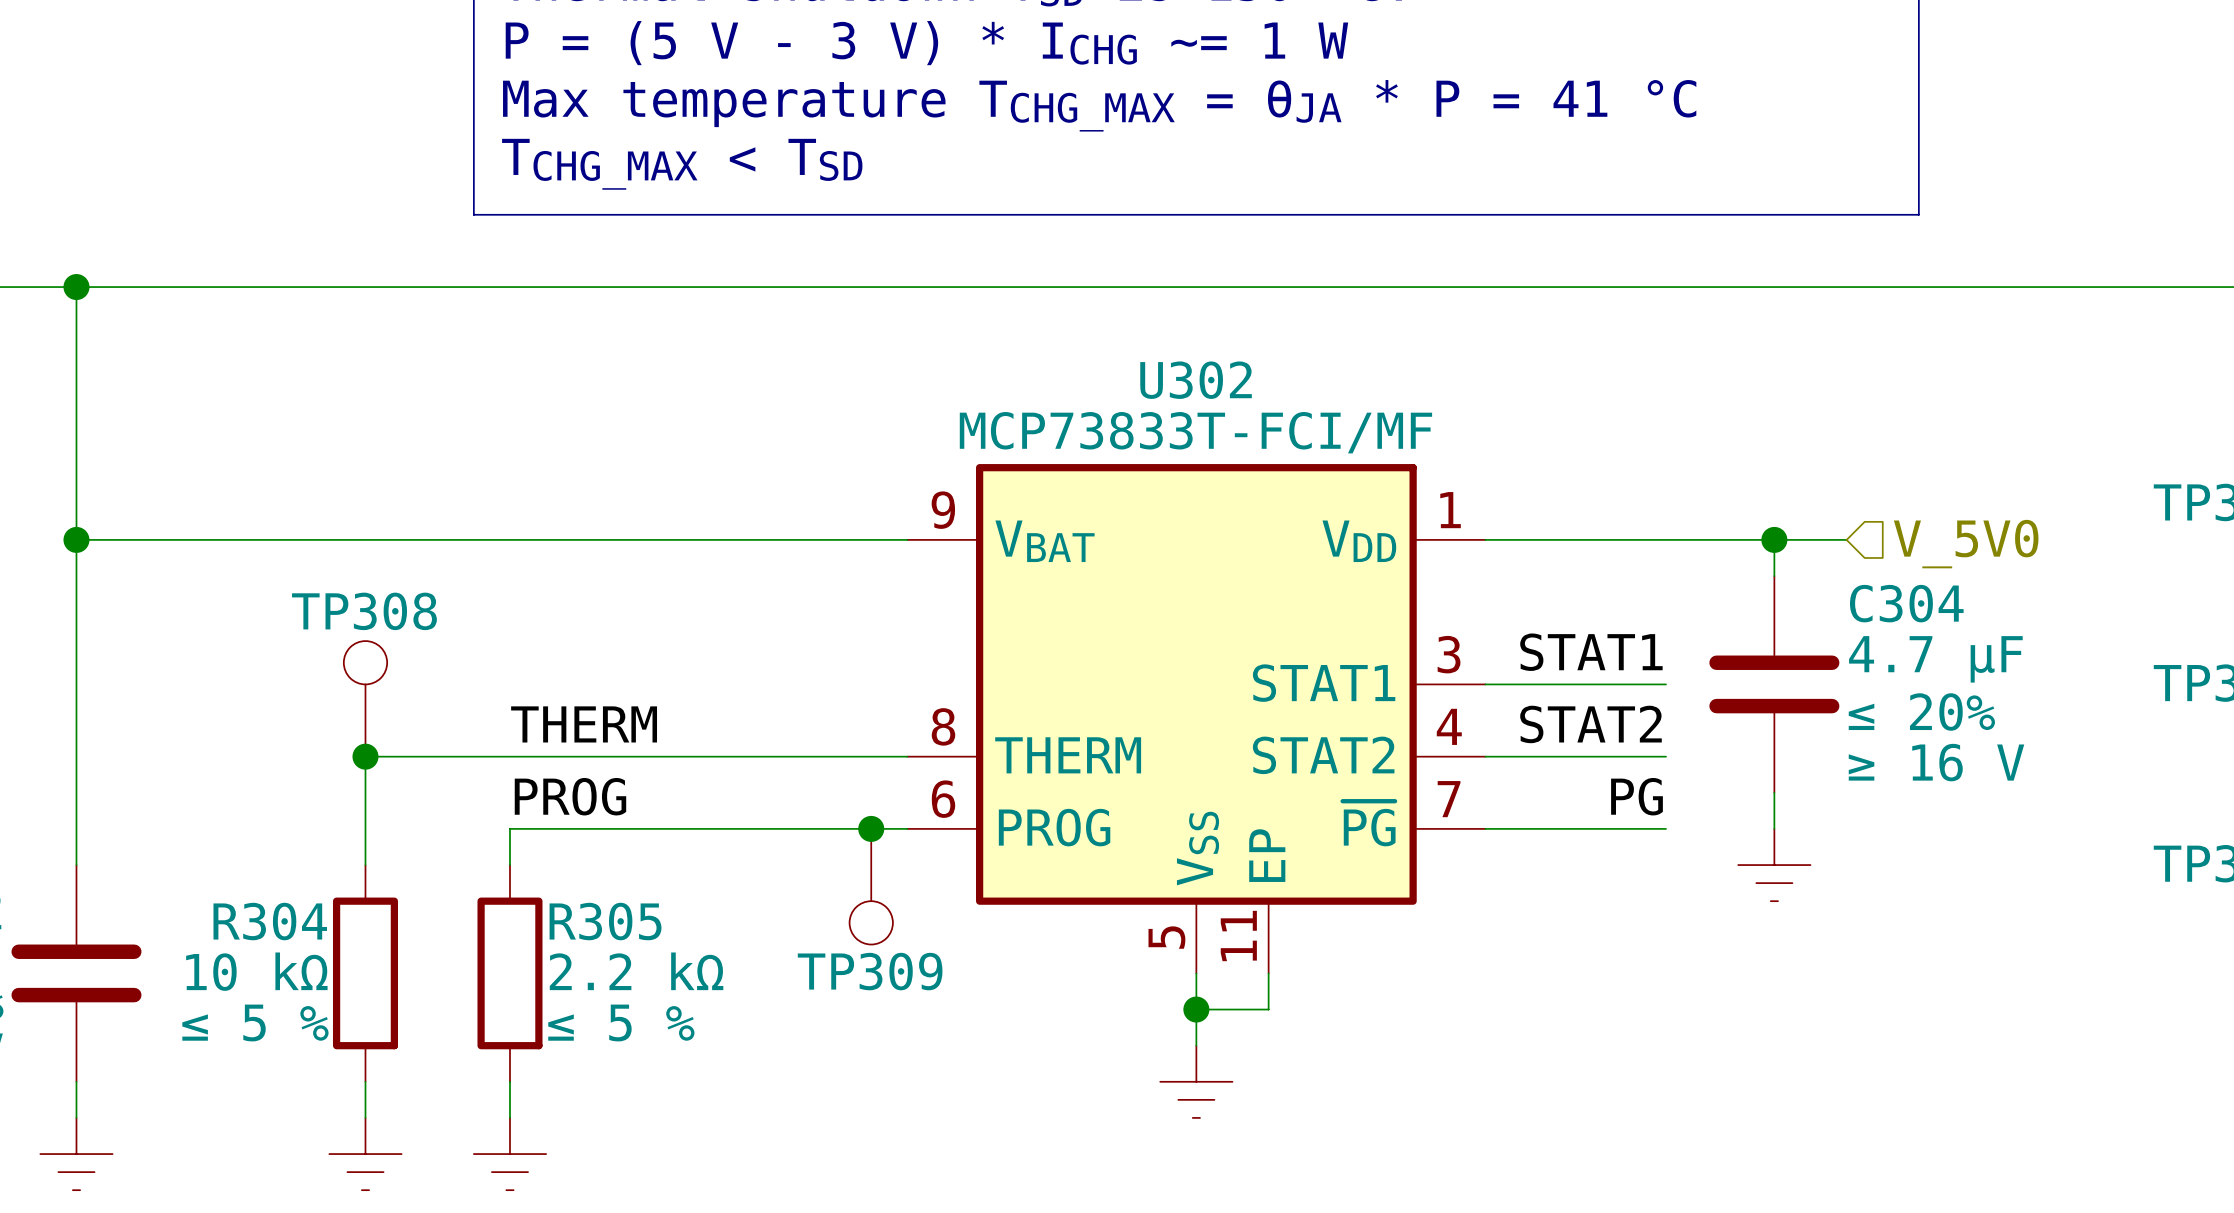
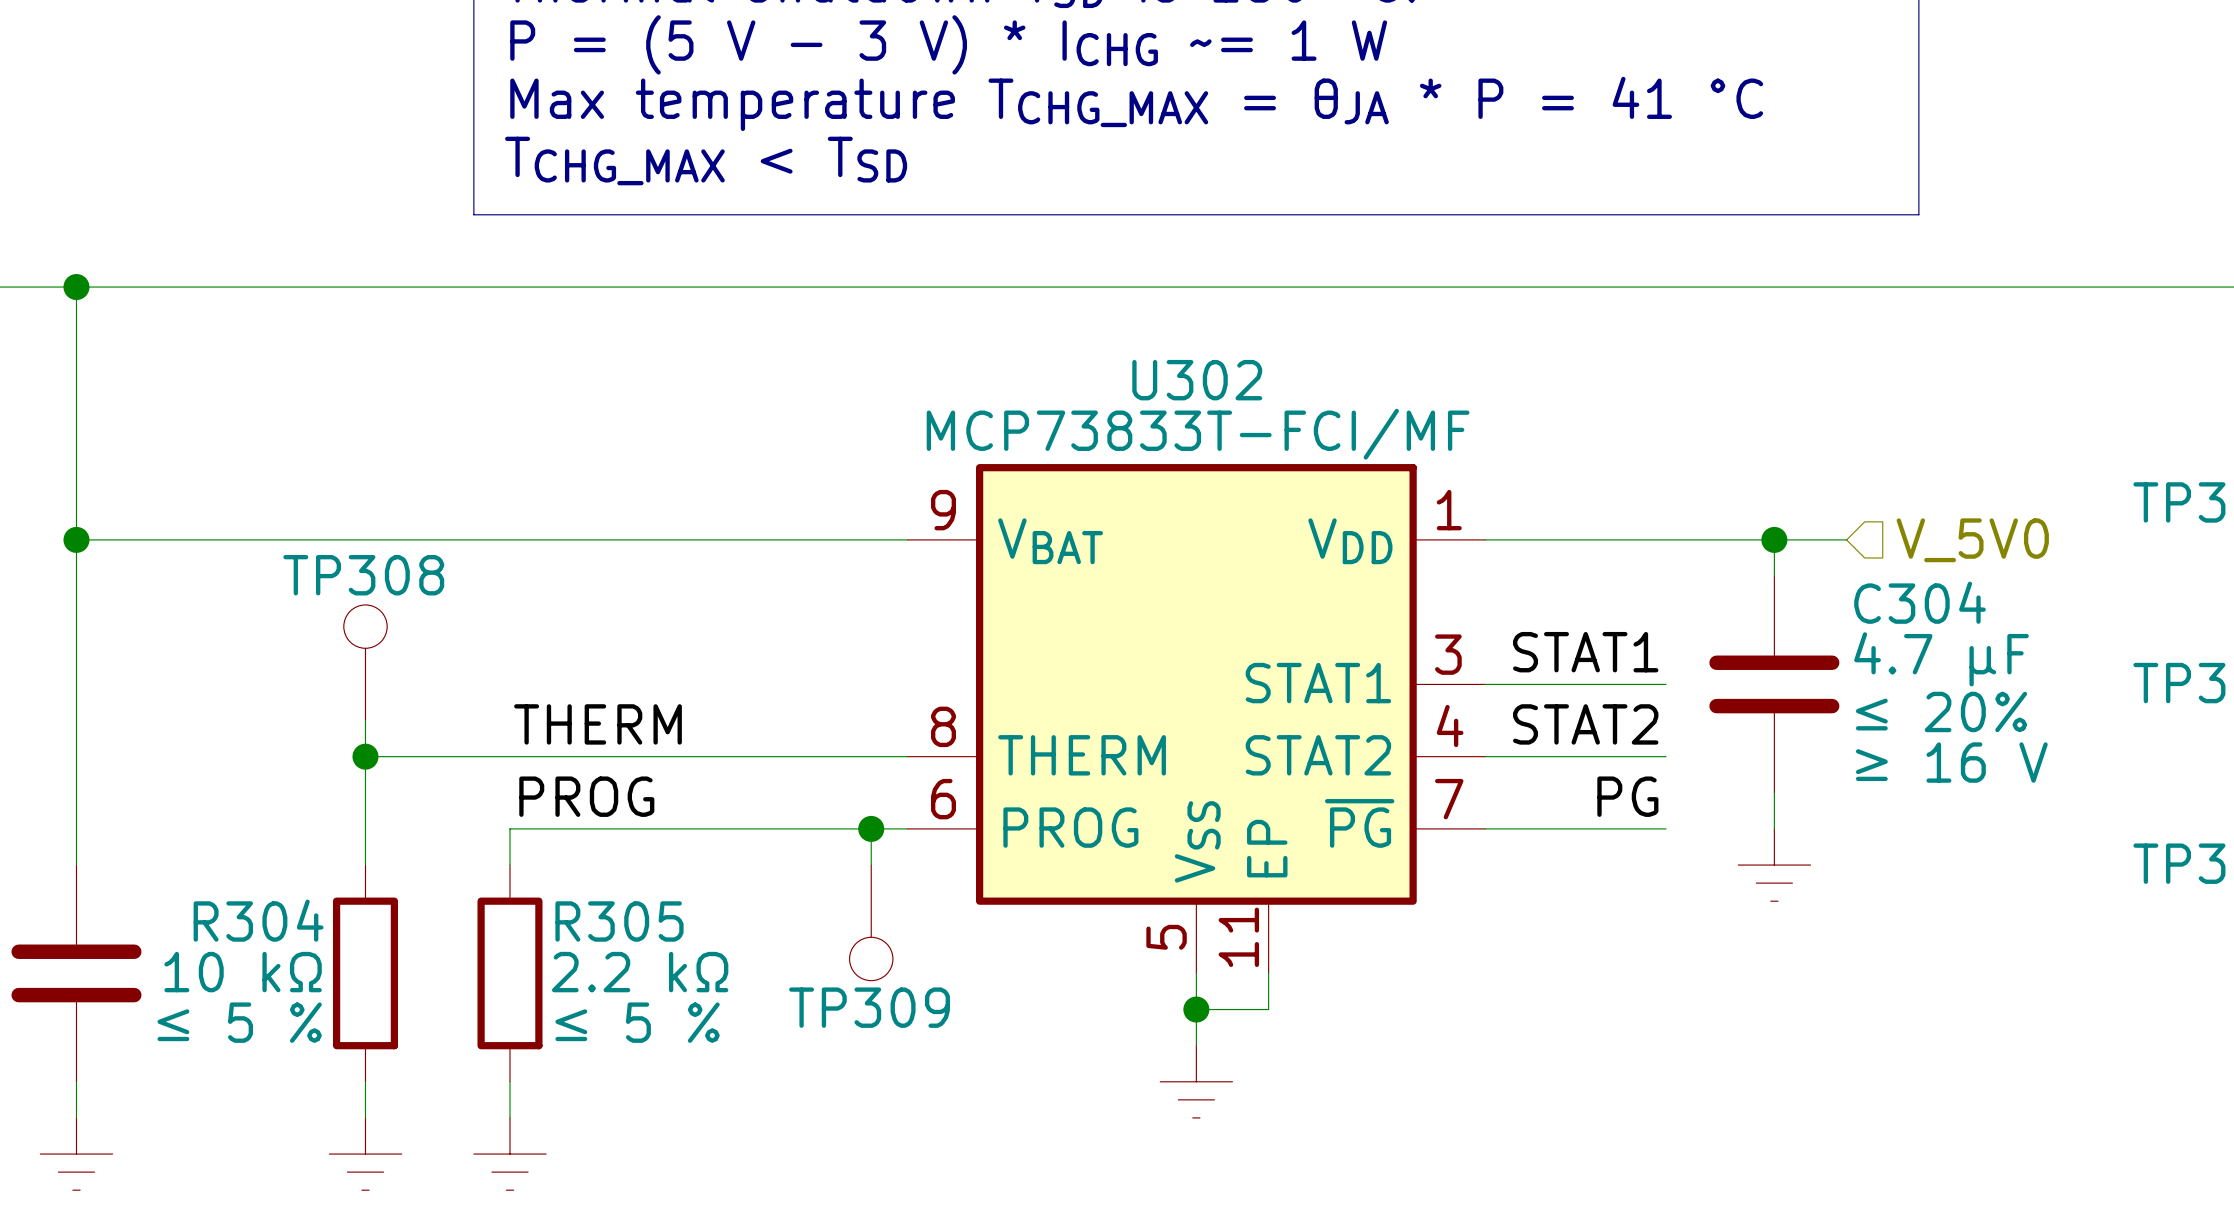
TP308 position: (365, 698) -> (365, 662)
TP309 position: (871, 886) -> (871, 922)

